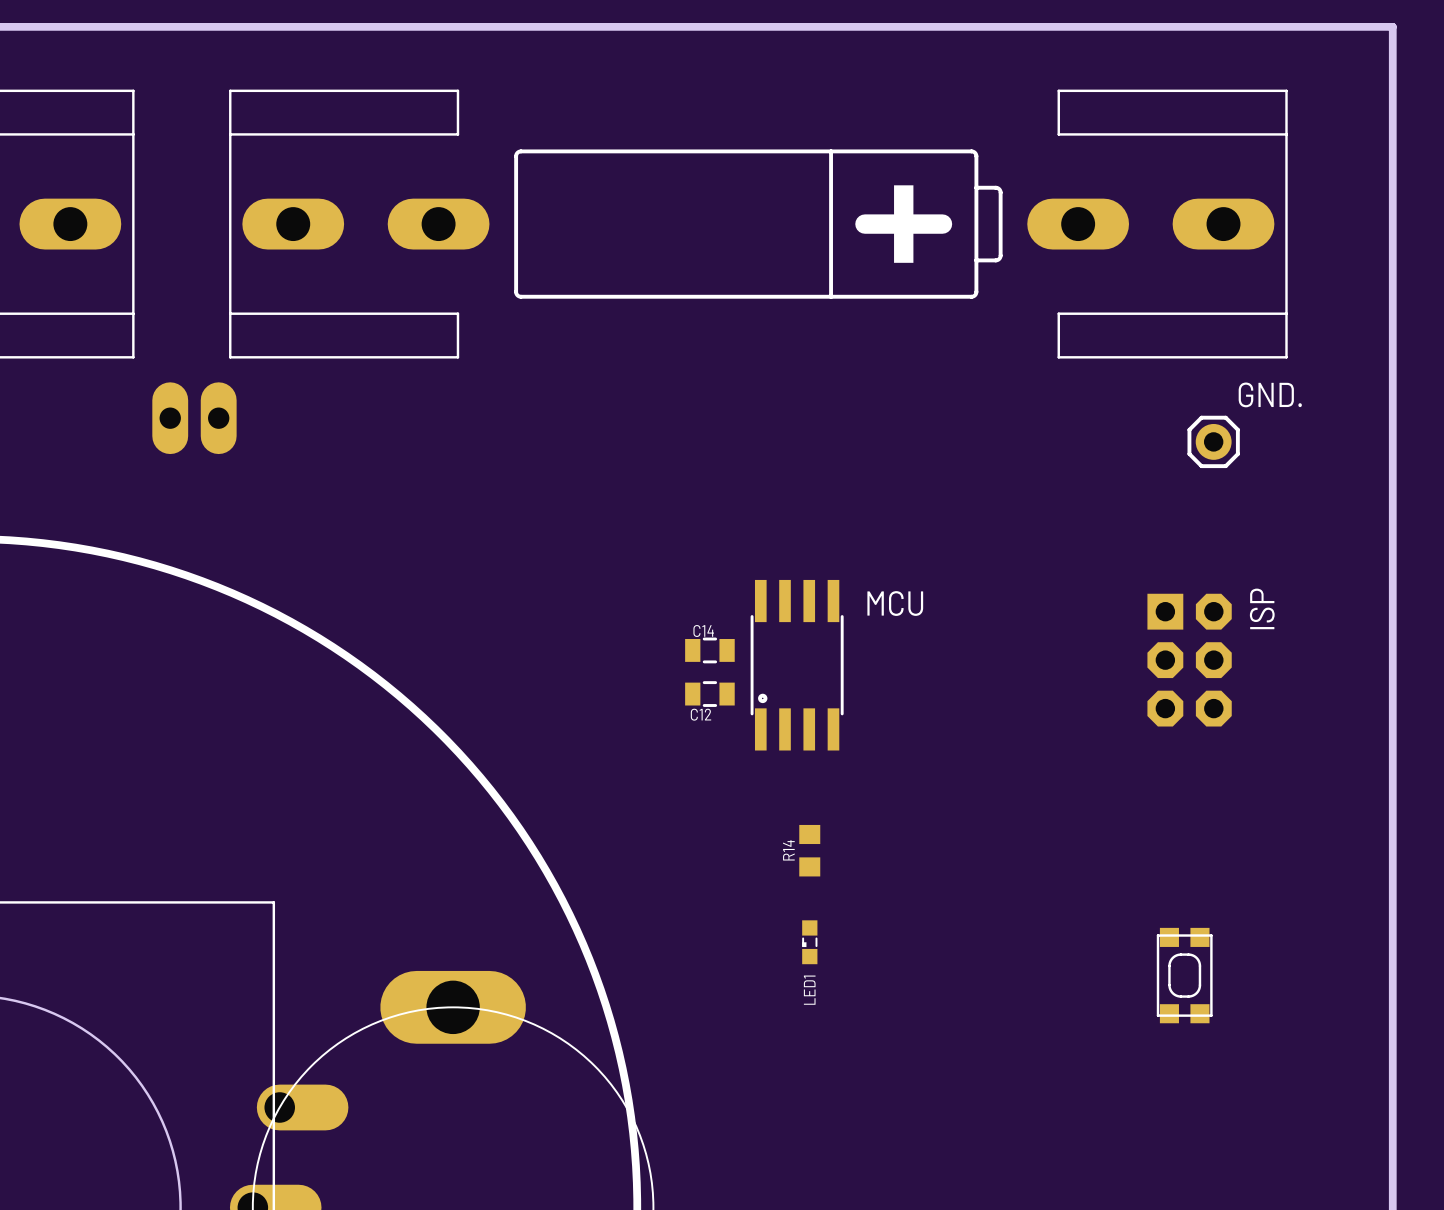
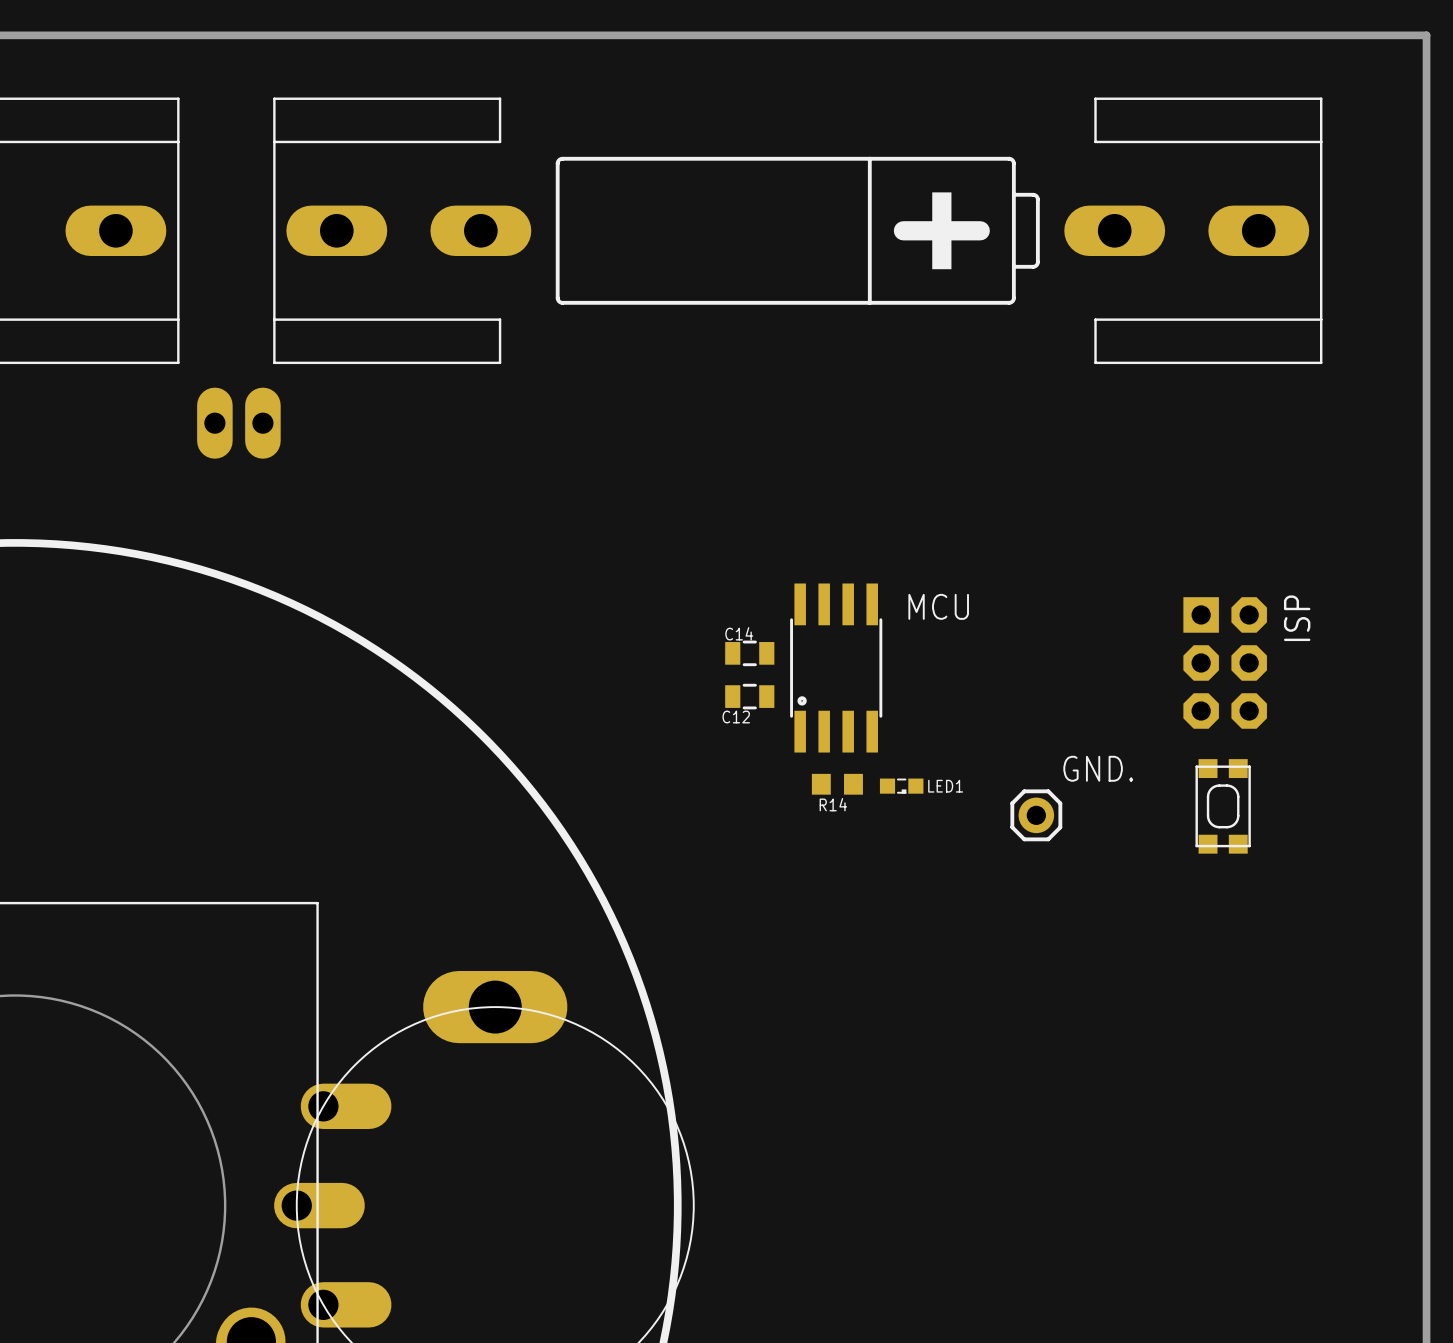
GND. position: (1213, 441) -> (1036, 815)
R14 rotation: 0° (809, 850) -> 90° clockwise (837, 784)
R14 position: (809, 850) -> (837, 784)
LED1 rotation: 0° (809, 942) -> 90° counterclockwise (901, 786)
LED1 position: (809, 942) -> (901, 786)
part position: (1184, 975) -> (1223, 806)

